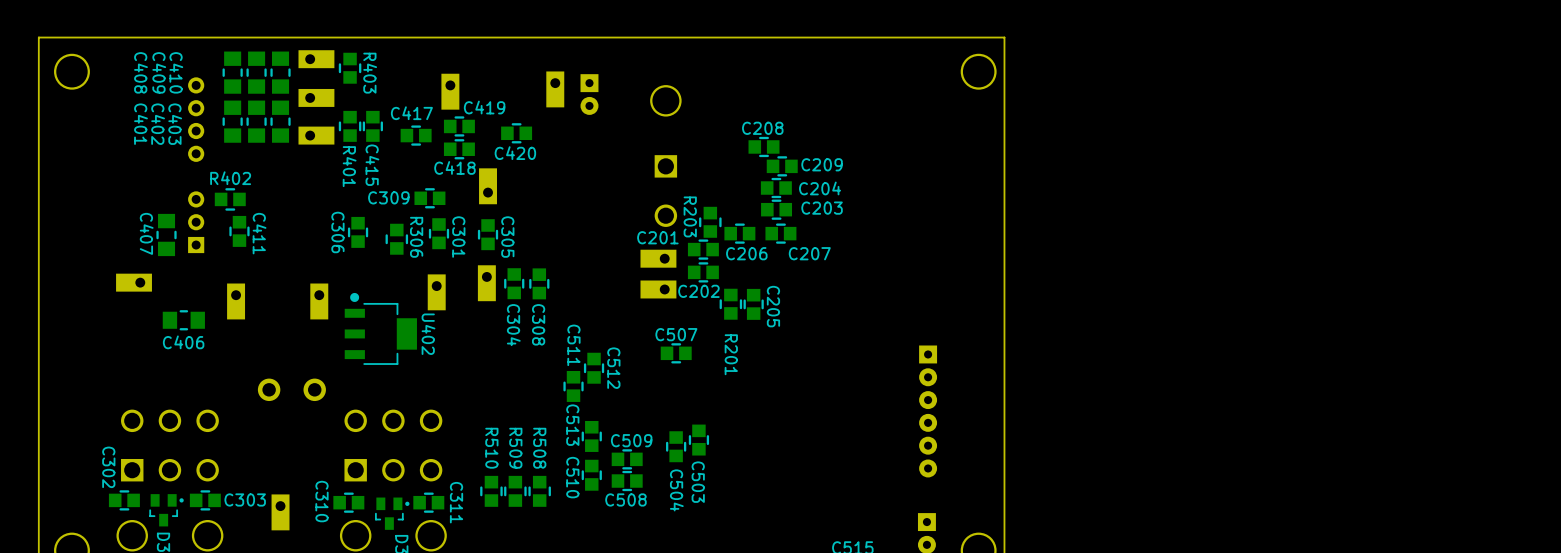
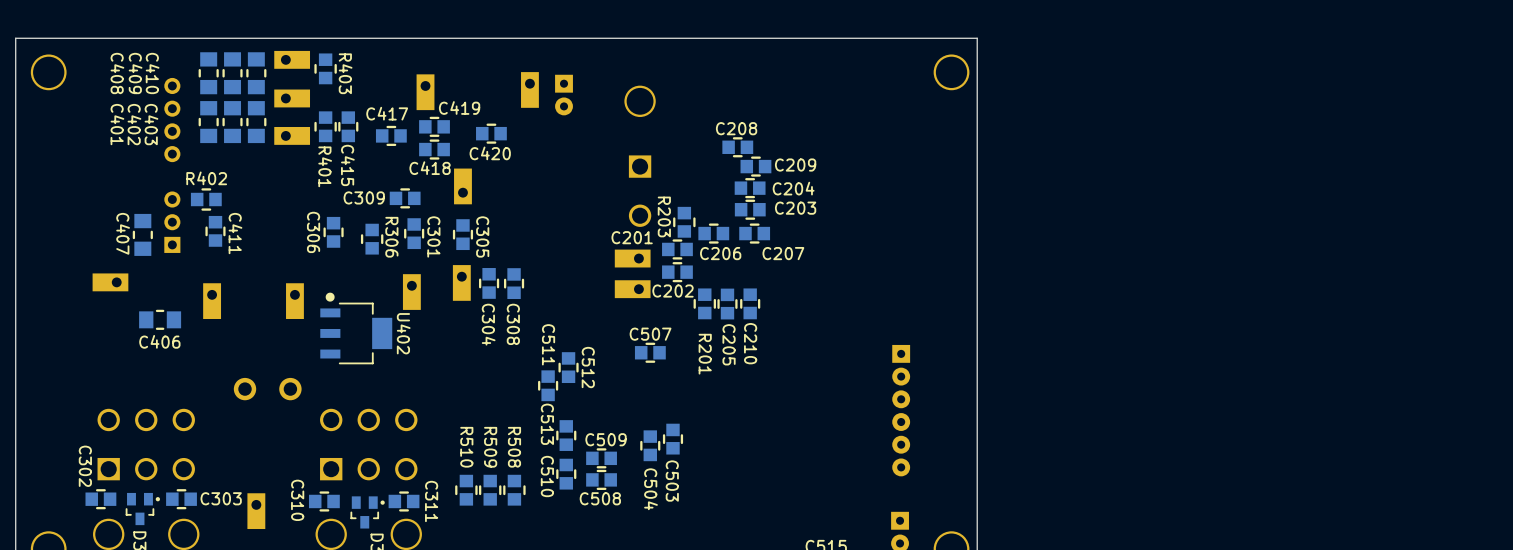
C210: none -> (750, 303)
C205 name position: C205 (773, 306) -> C205 (729, 344)

